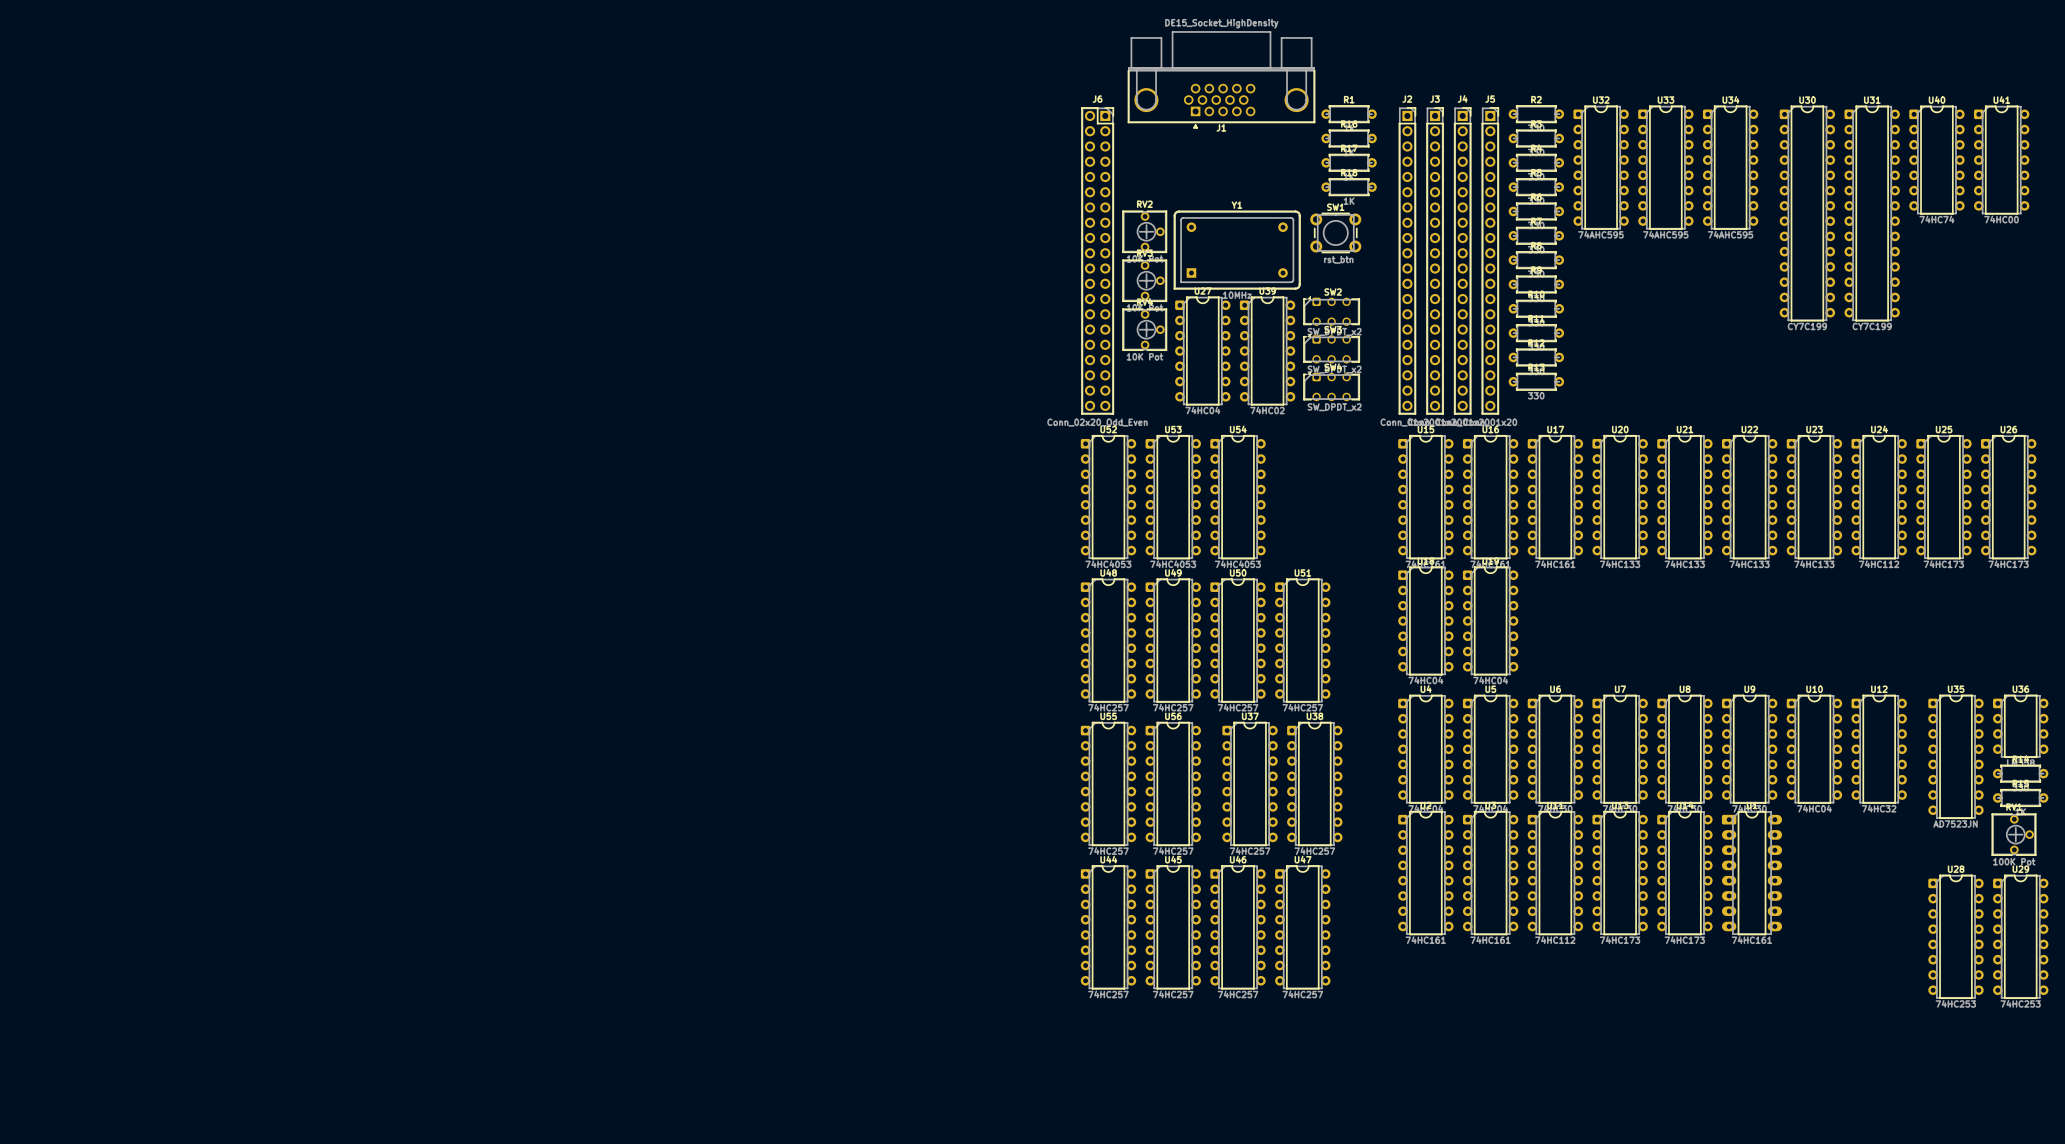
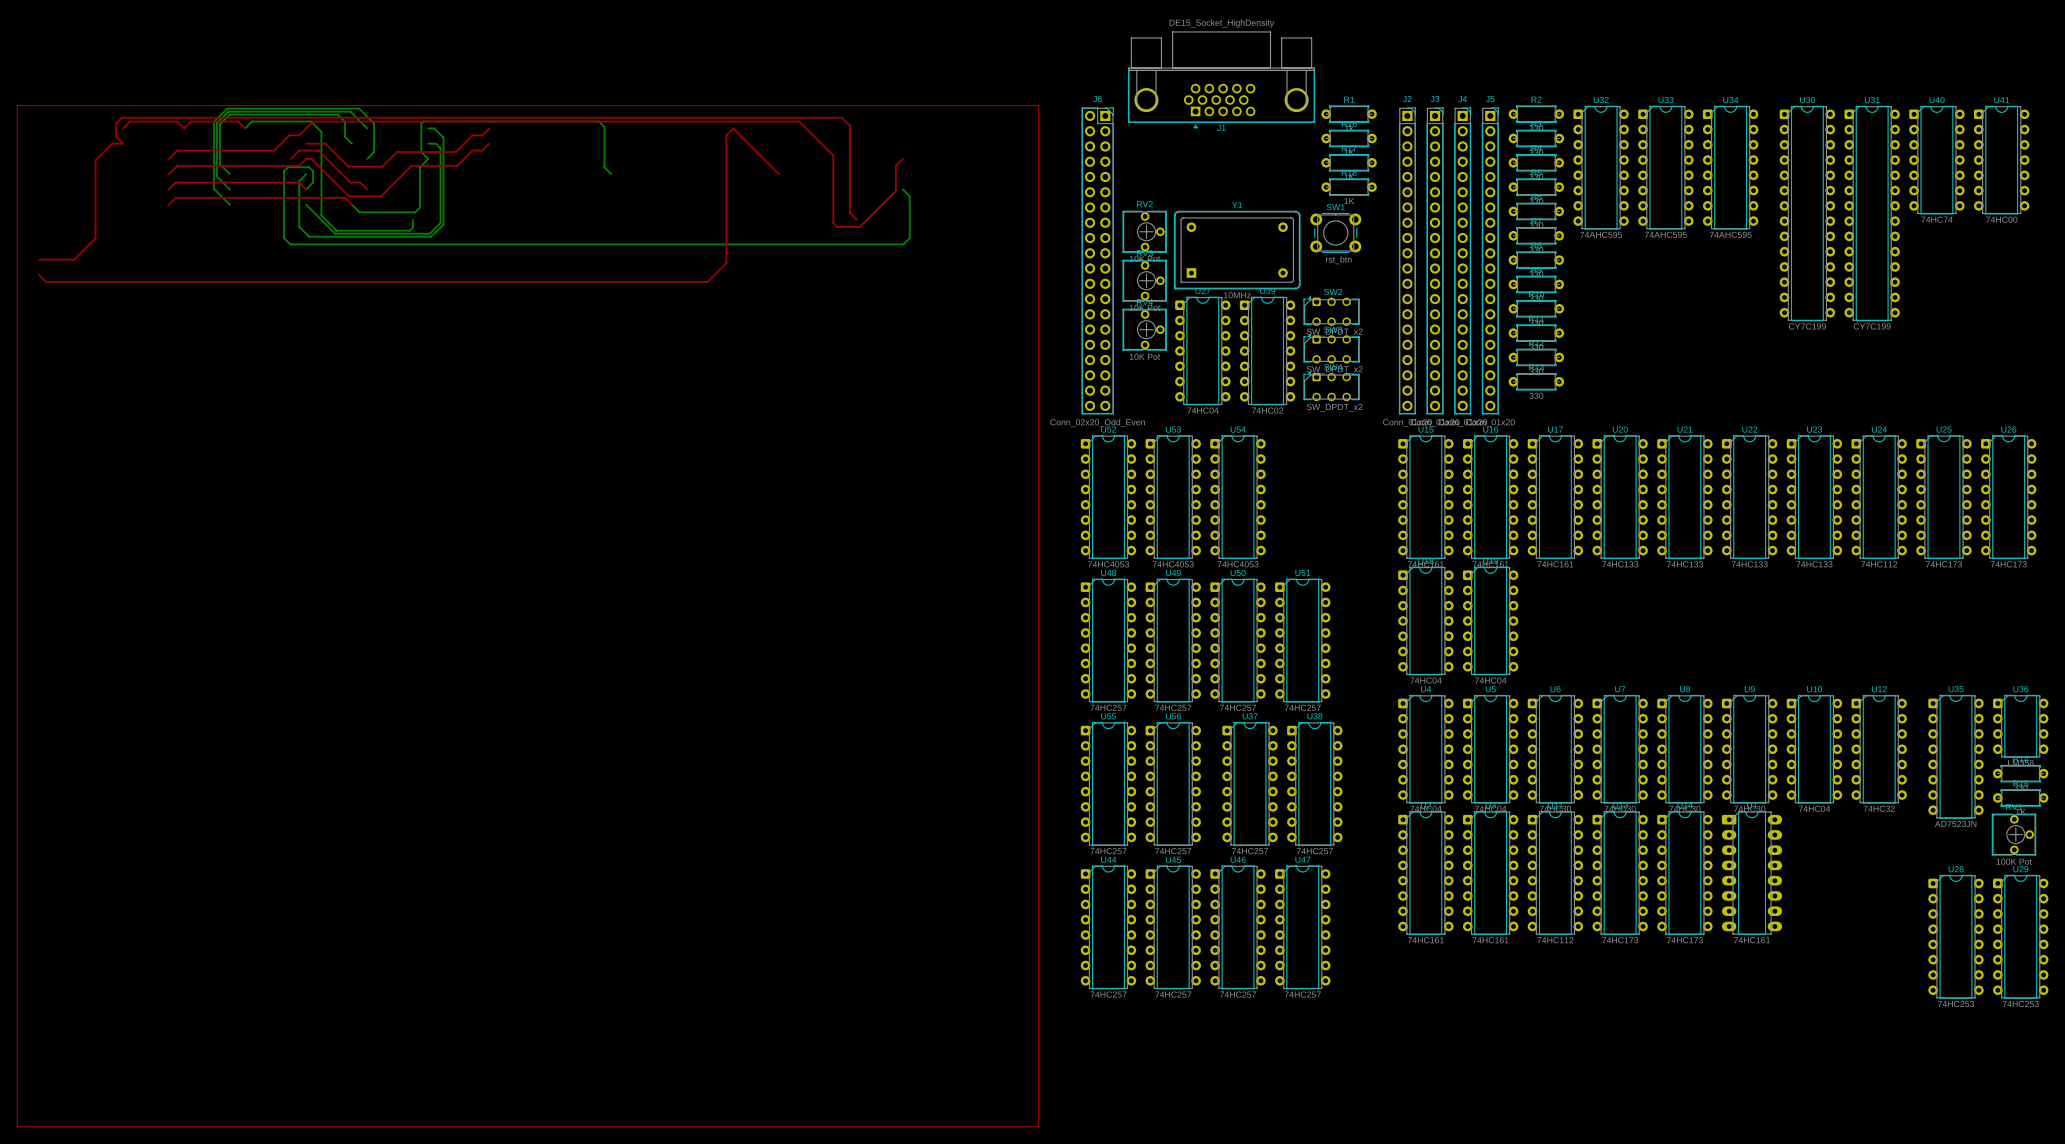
top track: none -> (17, 105) (1038, 105) (1038, 1126) (17, 1126) (17, 105)
top track: none -> (123, 128) (130, 121) (177, 121) (184, 128) (191, 121) (238, 121) (245, 128)
bottom track: none -> (245, 128) (252, 121) (311, 121) (321, 131) (321, 215) (336, 230)
bottom track: none -> (367, 128) (350, 111) (228, 111) (216, 123) (216, 176) (229, 189)
bottom track: none -> (428, 128) (434, 128) (443, 137) (443, 224) (431, 236) (309, 236) (299, 226) (299, 181) (306, 174)
top track: none -> (489, 128) (482, 135) (472, 135) (455, 152) (397, 152) (382, 166) (348, 166) (325, 143) (306, 143)
bottom track: none -> (351, 143) (345, 136) (345, 121) (337, 114) (229, 114) (219, 124) (219, 164) (229, 174)
bottom track: none -> (428, 143) (435, 143) (440, 148) (440, 222) (429, 233) (335, 233) (306, 204)
top track: none -> (489, 143) (482, 150) (472, 150) (457, 165) (411, 165) (381, 196) (349, 196) (311, 158) (306, 158) (299, 165) (177, 165) (168, 174)
top track: none -> (168, 158) (177, 150) (274, 150) (289, 135) (299, 135) (313, 121) (799, 121) (833, 155) (833, 222) (837, 226) (859, 226) (895, 190) (895, 165) (902, 158)
top track: none -> (290, 158) (299, 150) (318, 150) (350, 182) (360, 182) (367, 189)
bottom track: none -> (367, 158) (374, 152) (374, 123) (359, 108) (227, 108) (213, 121) (213, 188) (229, 204)
bottom track: none -> (611, 174) (604, 167) (604, 126) (599, 121) (423, 121) (421, 123) (421, 152) (428, 158) (419, 167) (419, 207) (415, 212) (359, 212) (351, 204)
top track: none -> (779, 174) (733, 128) (726, 135) (726, 262) (707, 281) (46, 281) (39, 274)
top track: none -> (168, 189) (175, 182) (299, 182) (306, 189)
bottom track: none -> (306, 189) (313, 182) (313, 171) (309, 167) (288, 167) (284, 171) (284, 238) (290, 244) (903, 244) (909, 238) (909, 196) (902, 189)
top track: none -> (168, 204) (175, 197) (345, 197) (351, 204)
bottom track: none -> (412, 219) (412, 227) (409, 230) (336, 230)
top track: none -> (857, 219) (850, 213) (850, 126) (841, 117) (122, 117) (116, 123) (116, 136) (123, 143) (112, 143) (95, 160) (95, 238) (74, 259) (39, 259)

